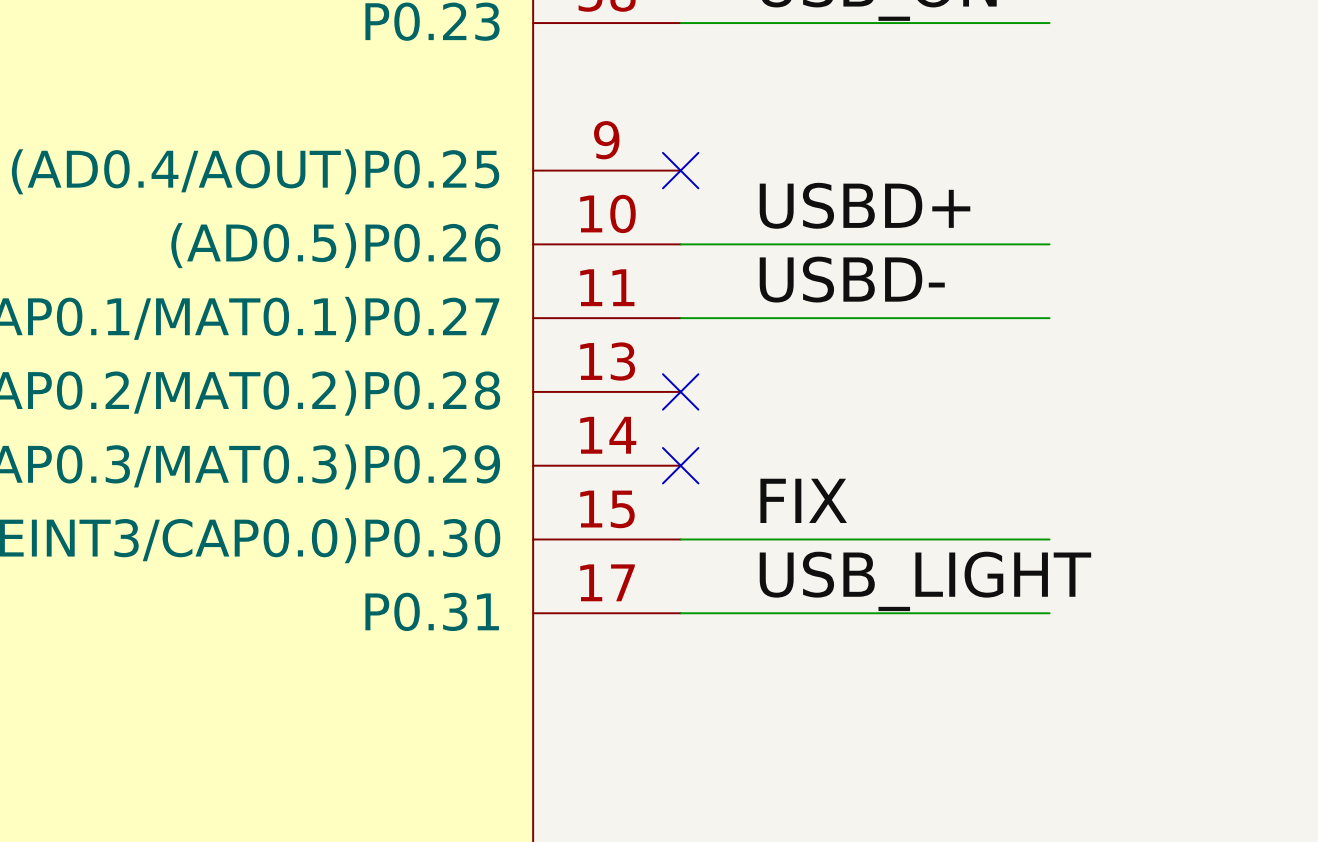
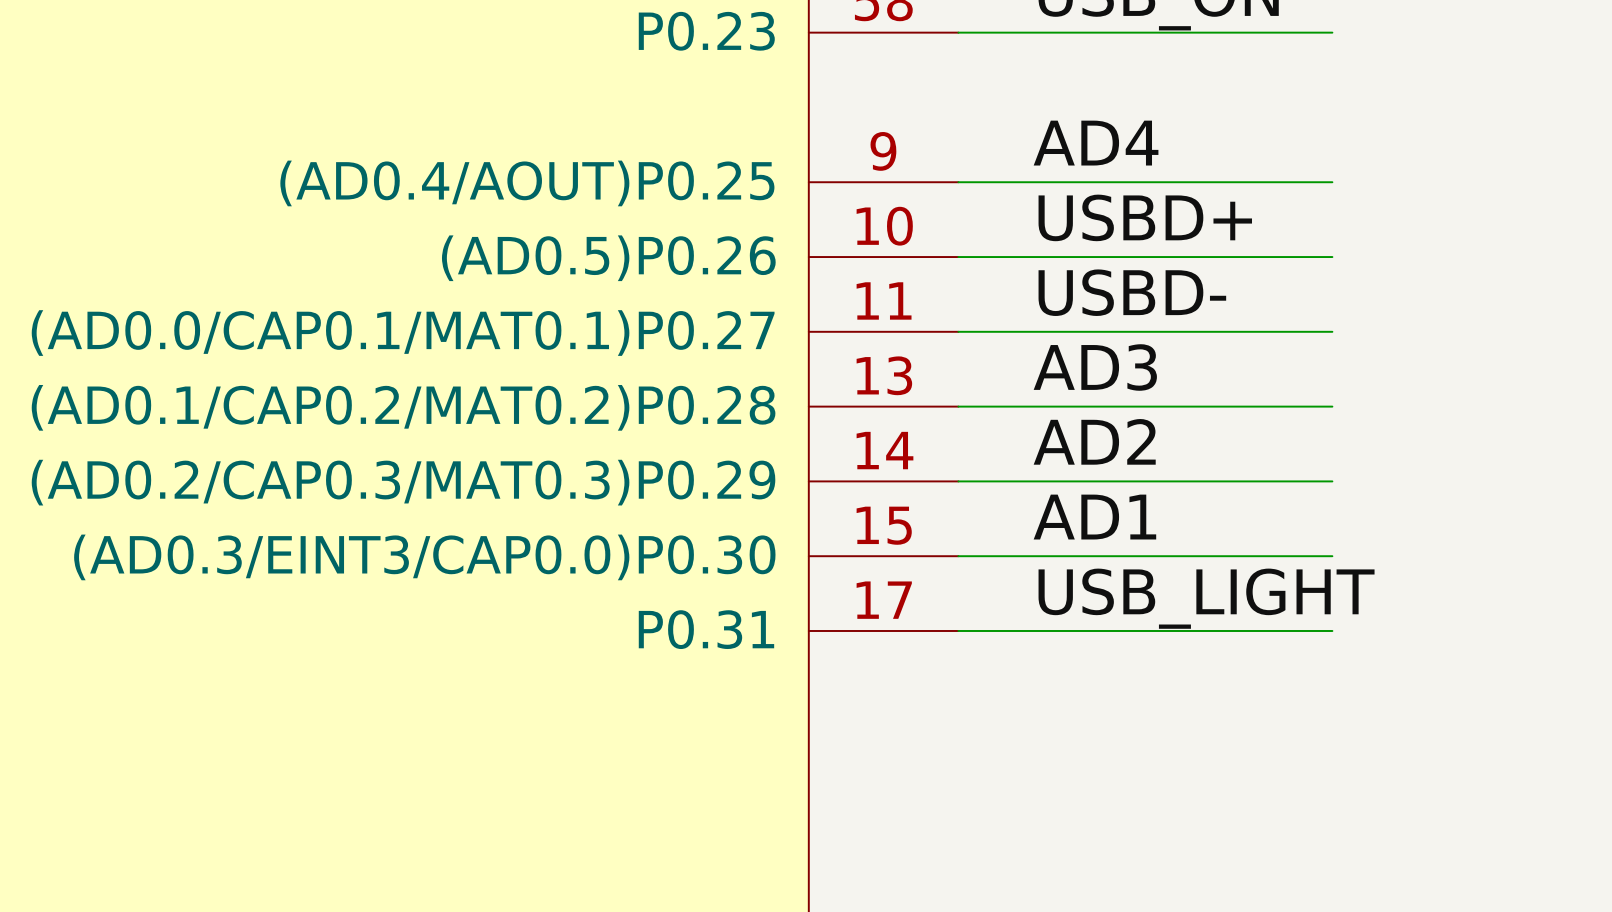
label: none -> AD4 (1096, 143)
wire: none -> (958, 182) (1332, 182)
no-connect mark: (680, 170) -> none
label: none -> AD3 (1095, 367)
wire: none -> (958, 406) (1332, 406)
no-connect mark: (680, 391) -> none
label: none -> AD2 (1094, 441)
wire: none -> (958, 481) (1332, 481)
no-connect mark: (680, 465) -> none
label: FIX (803, 500) -> AD1 (1094, 517)

